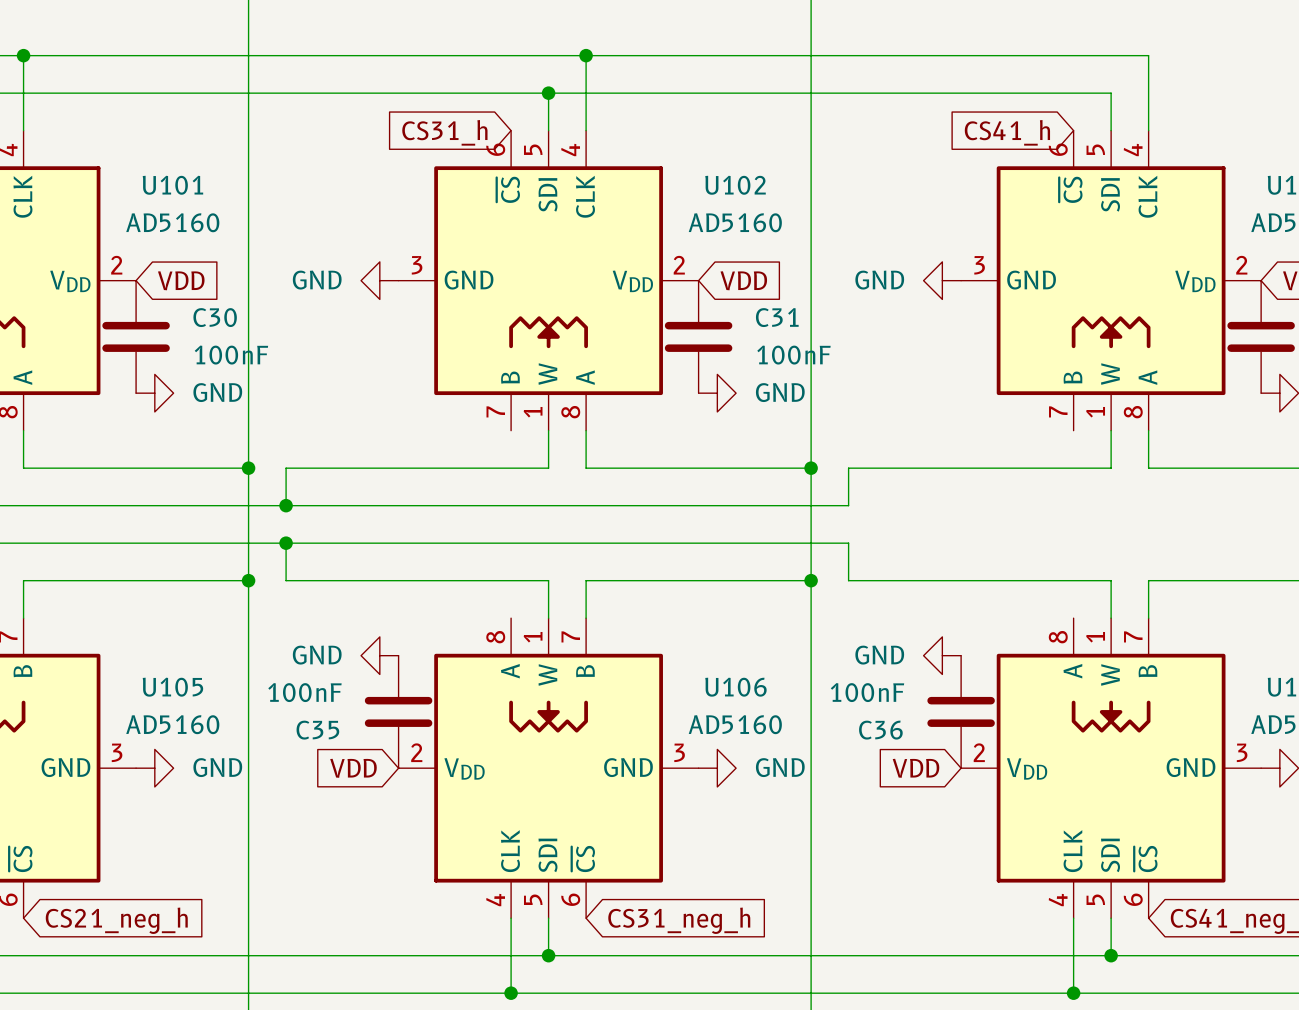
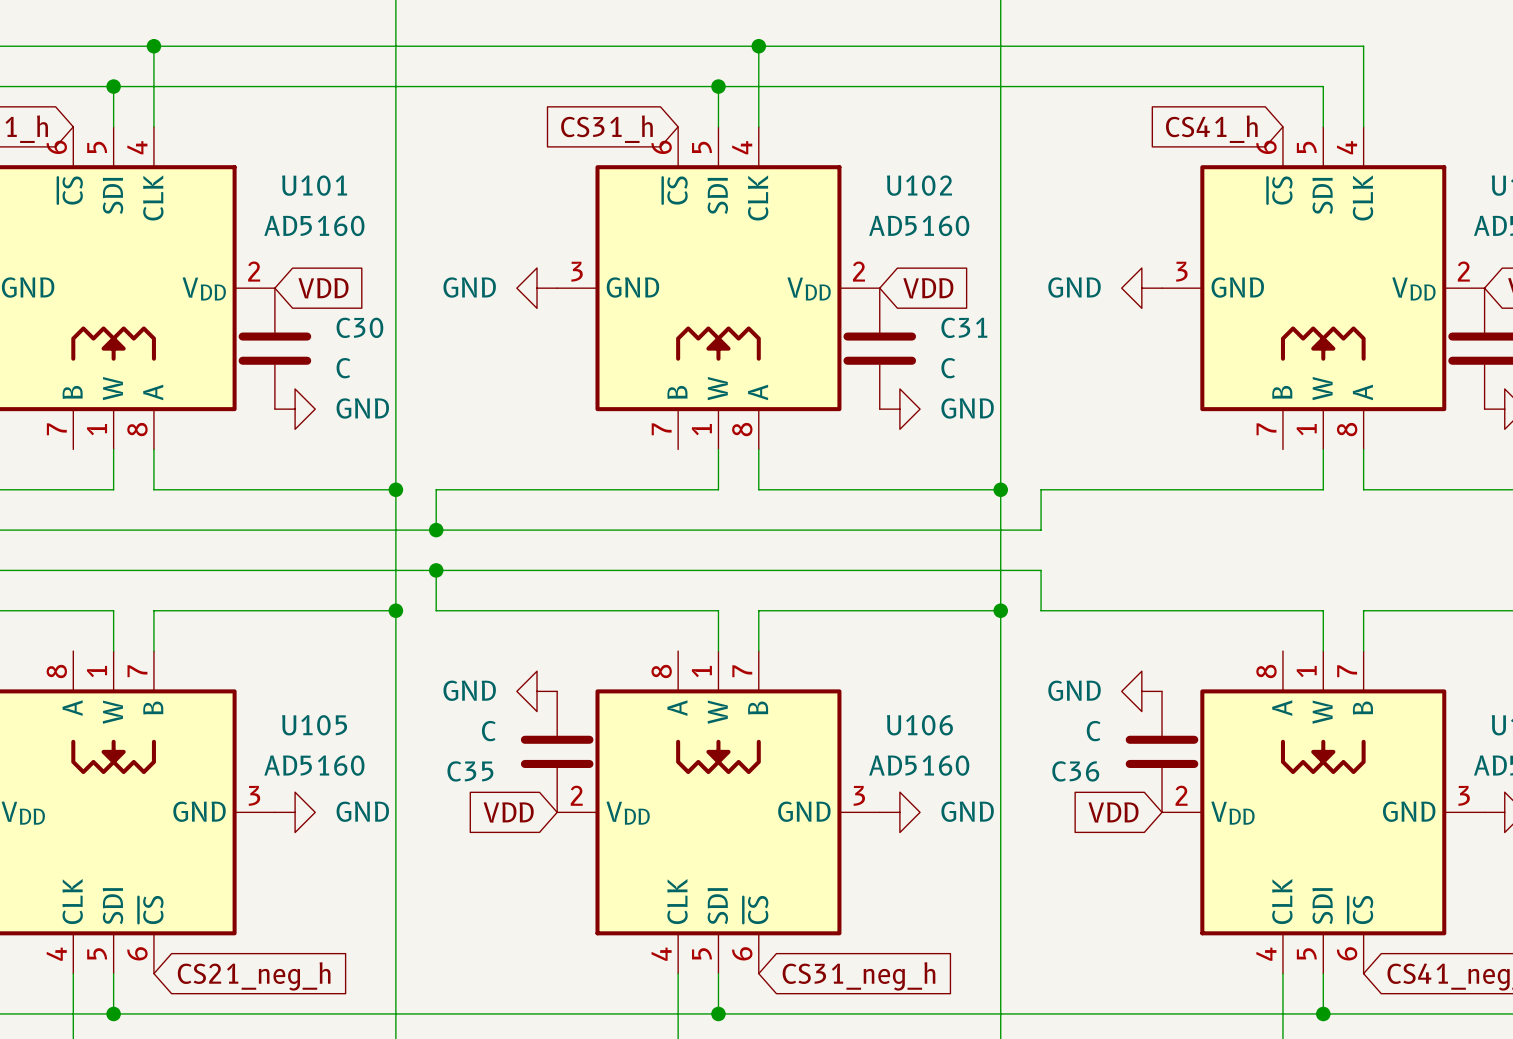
C30 value: 100nF (231, 355) -> C (343, 368)
C31 value: 100nF (793, 355) -> C (948, 368)
C35 value: 100nF (304, 692) -> C (488, 731)
C36 value: 100nF (867, 692) -> C (1093, 731)

